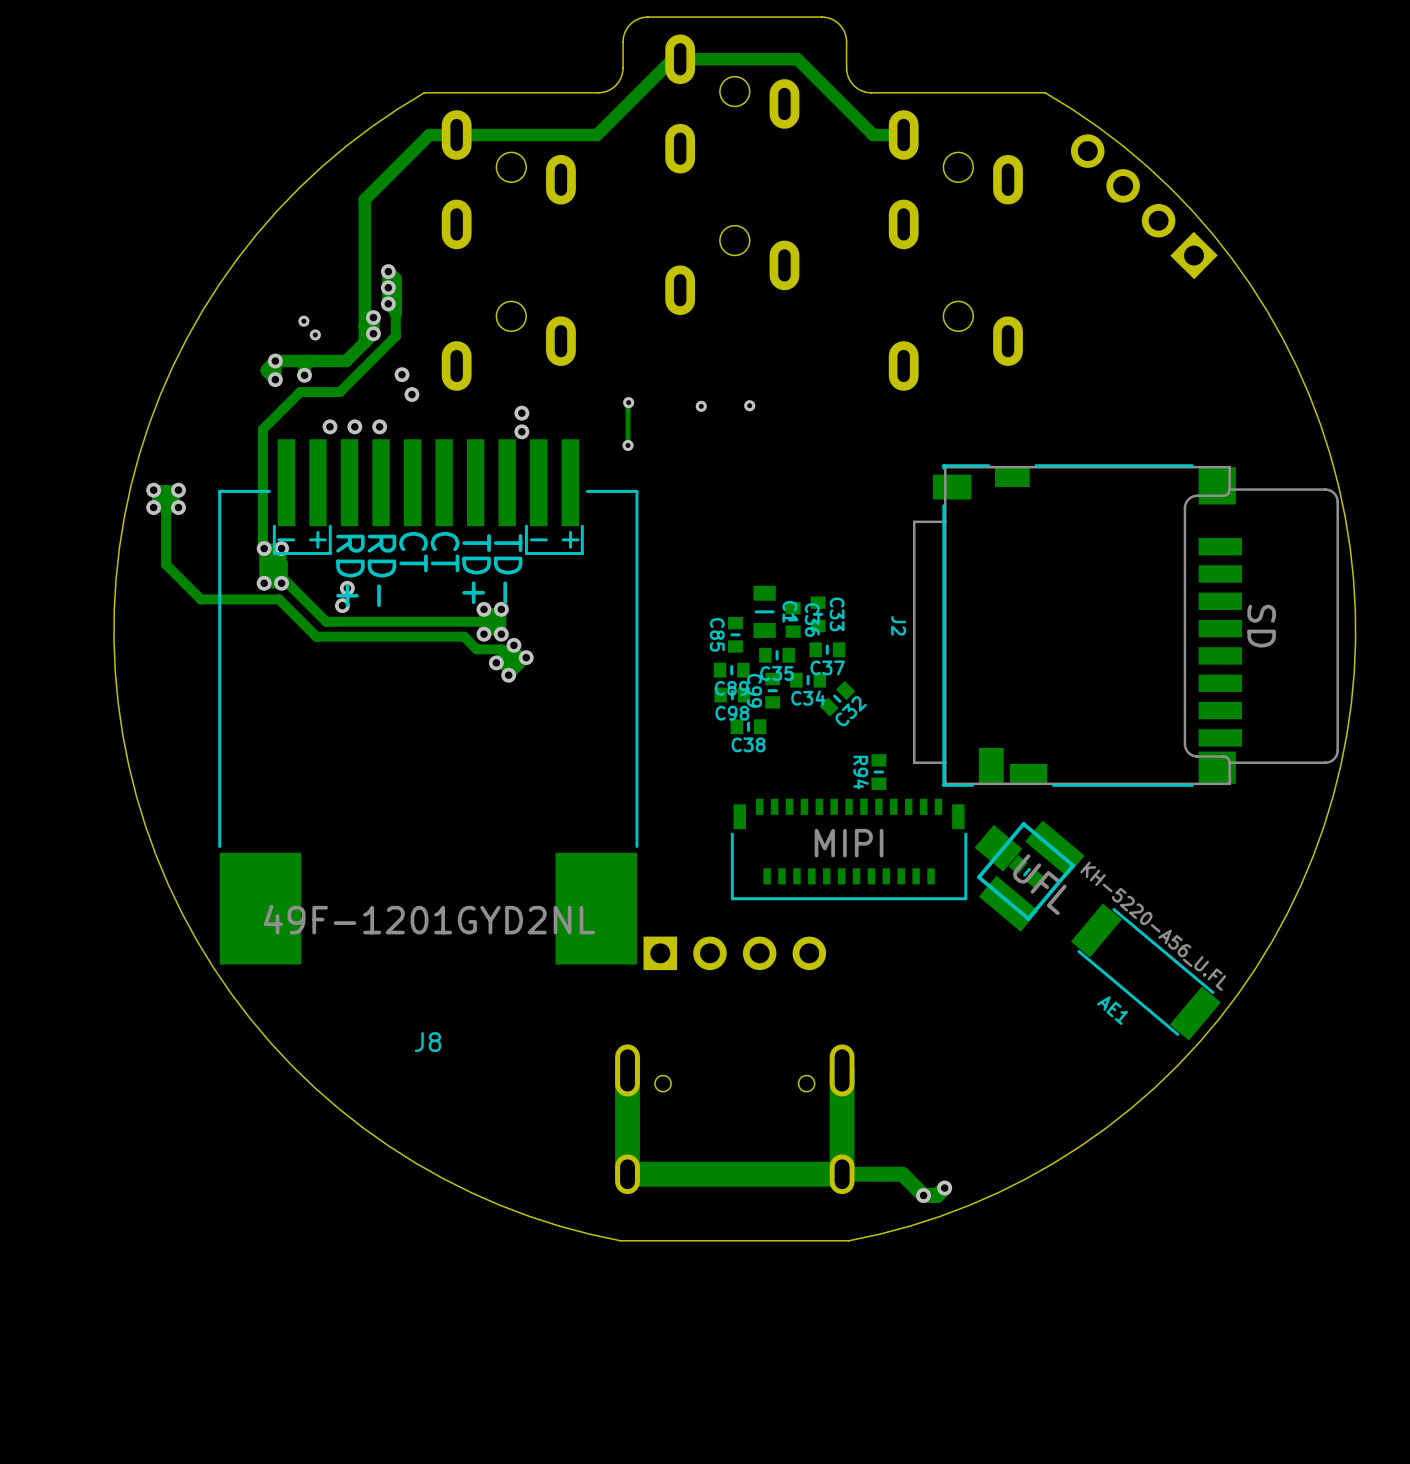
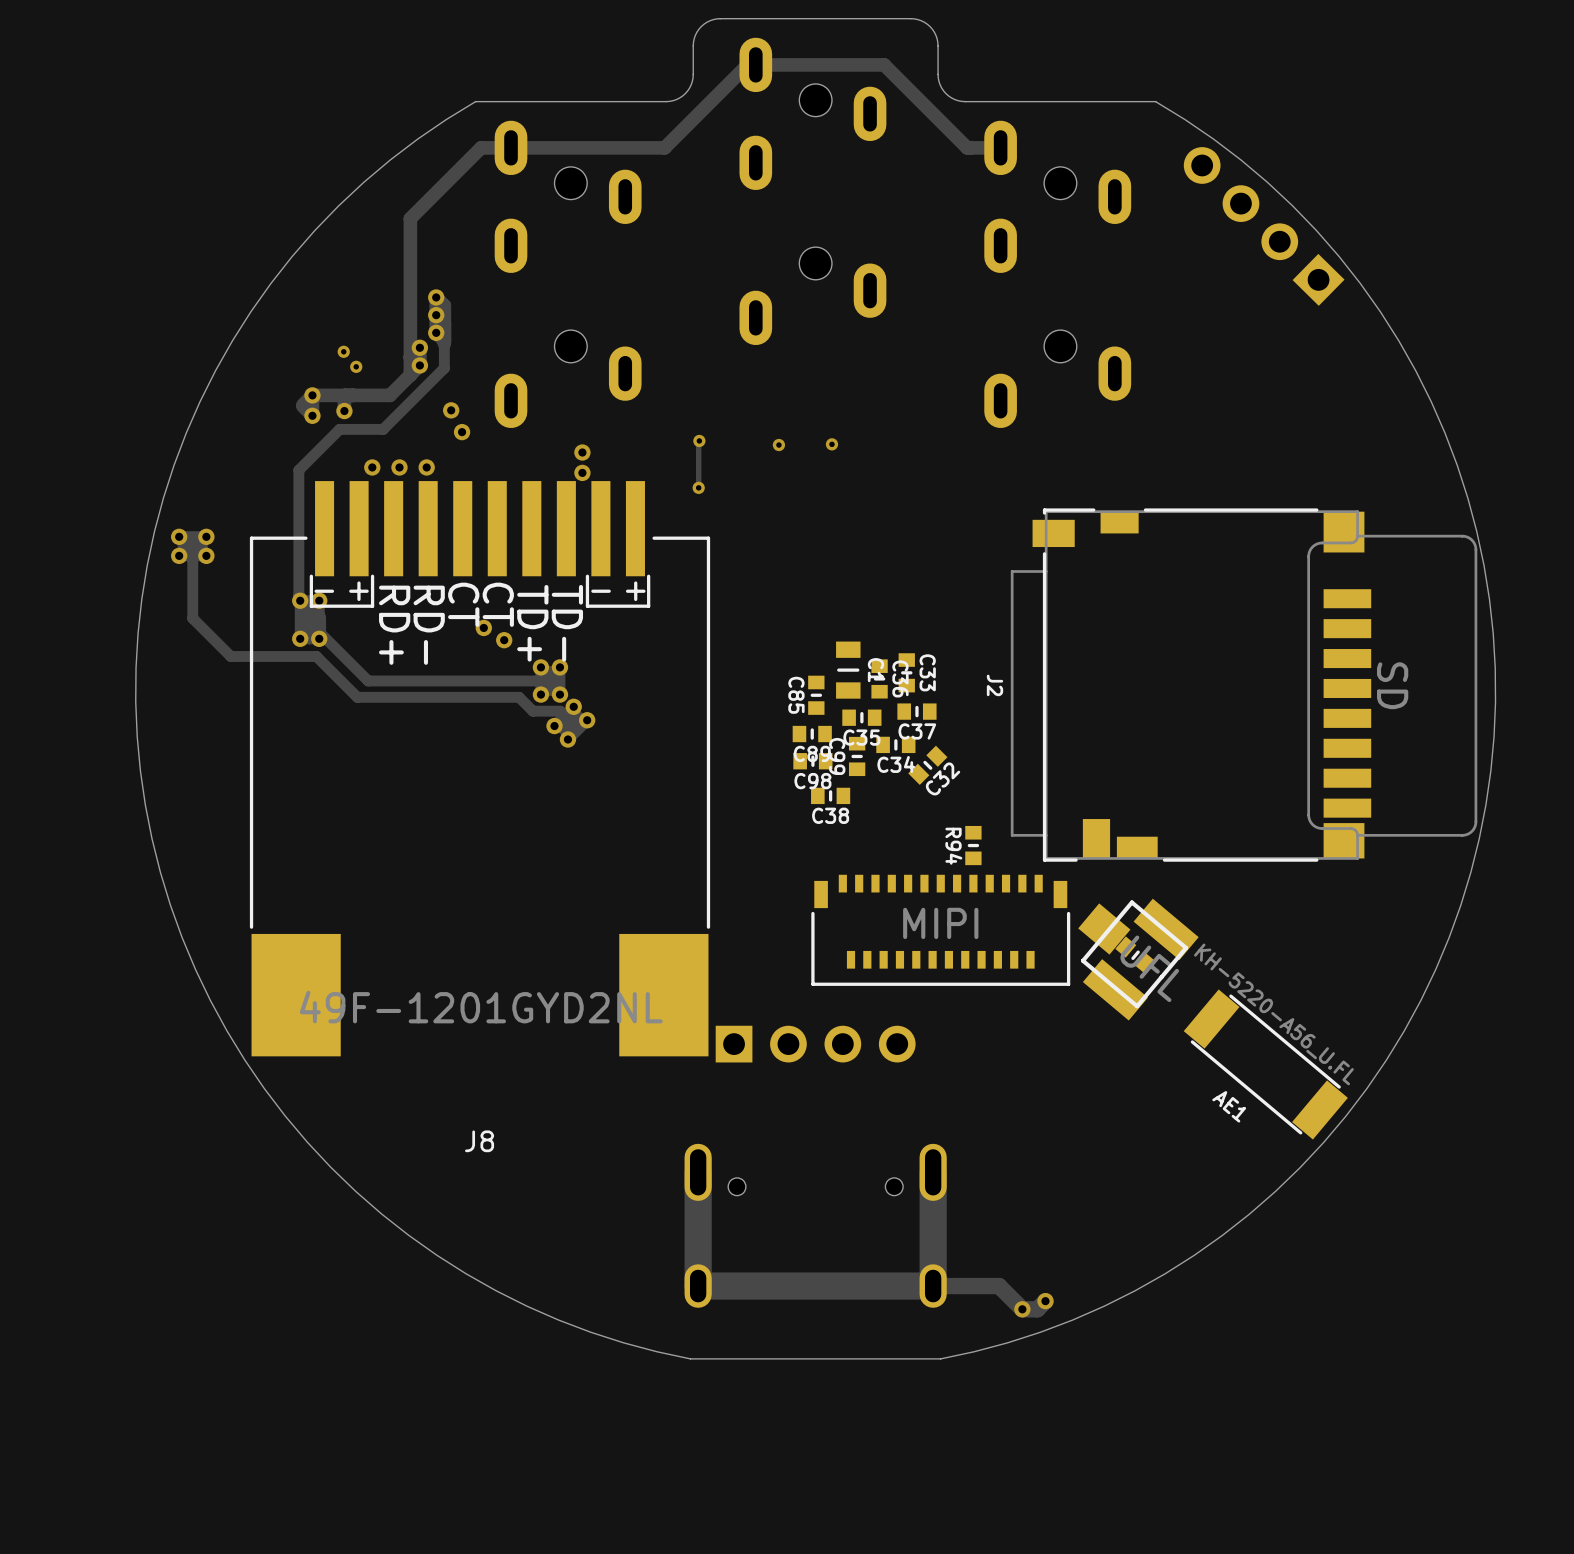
via: none -> (483, 627)
via: none -> (504, 640)
via: (347, 588) -> none
via: (342, 605) -> none

